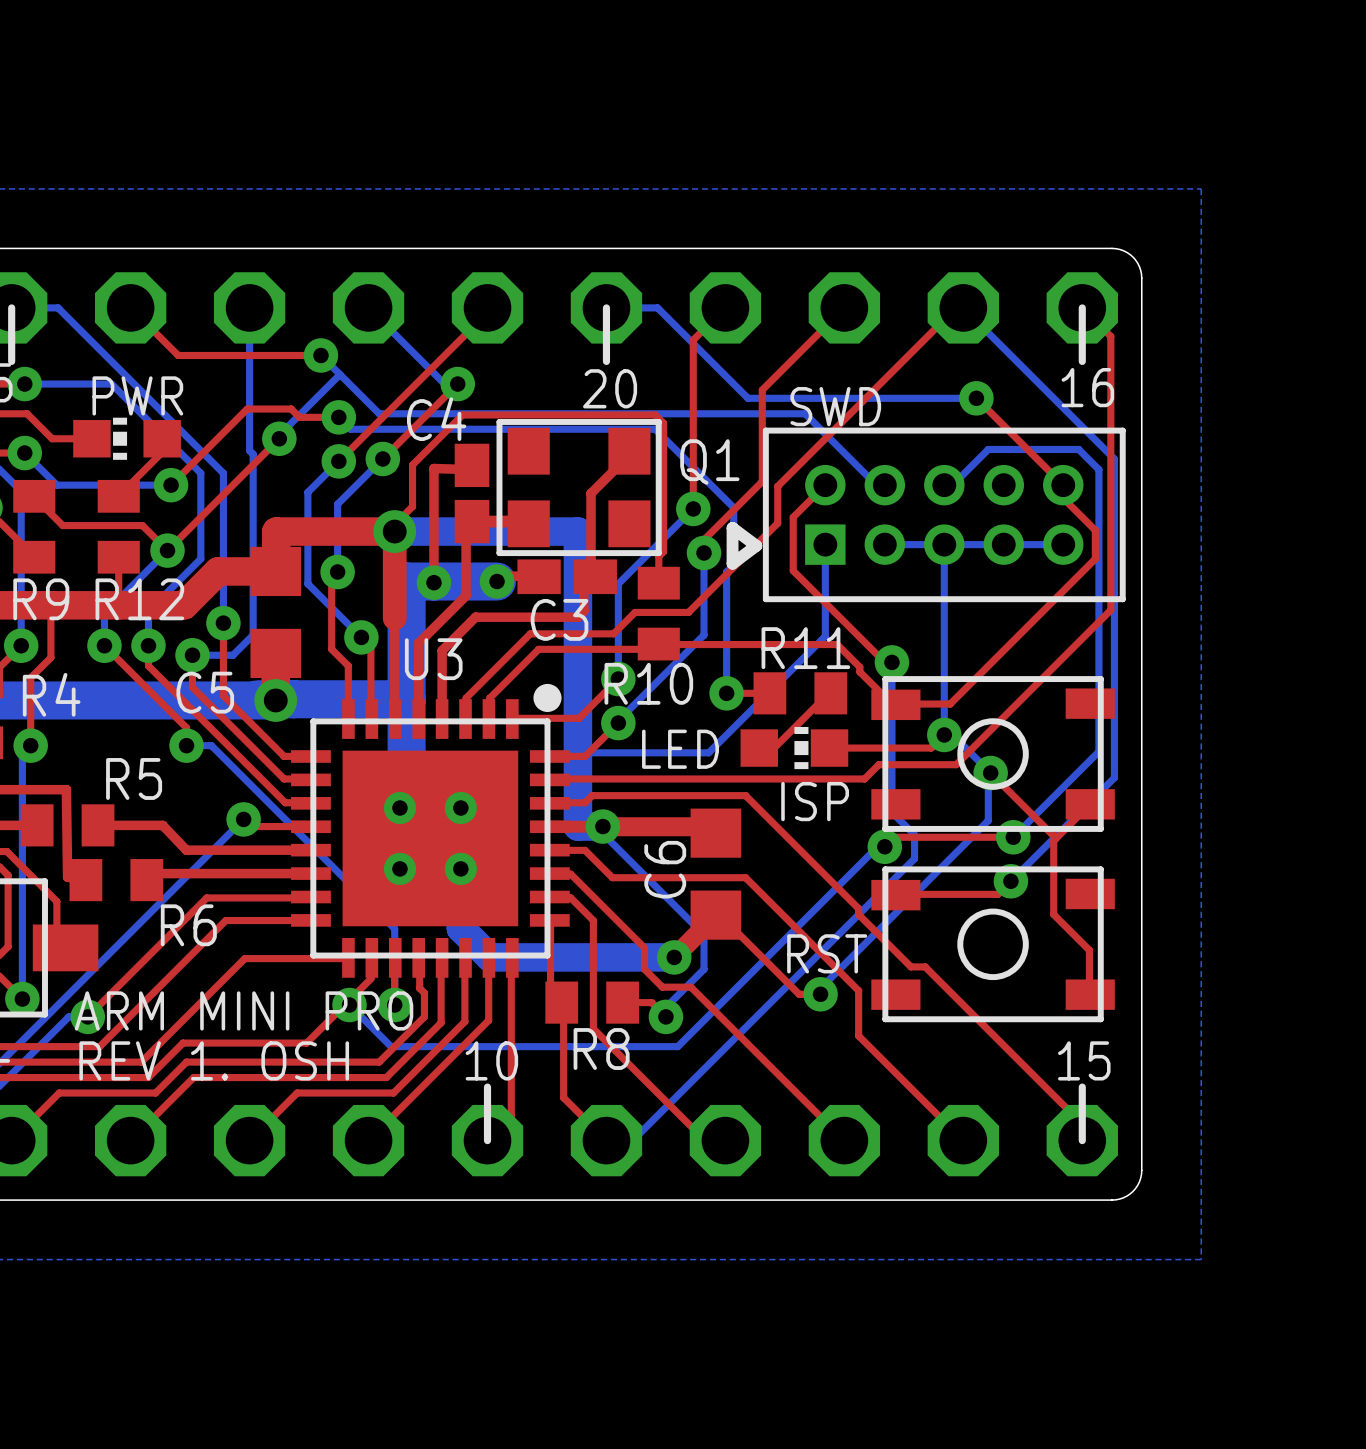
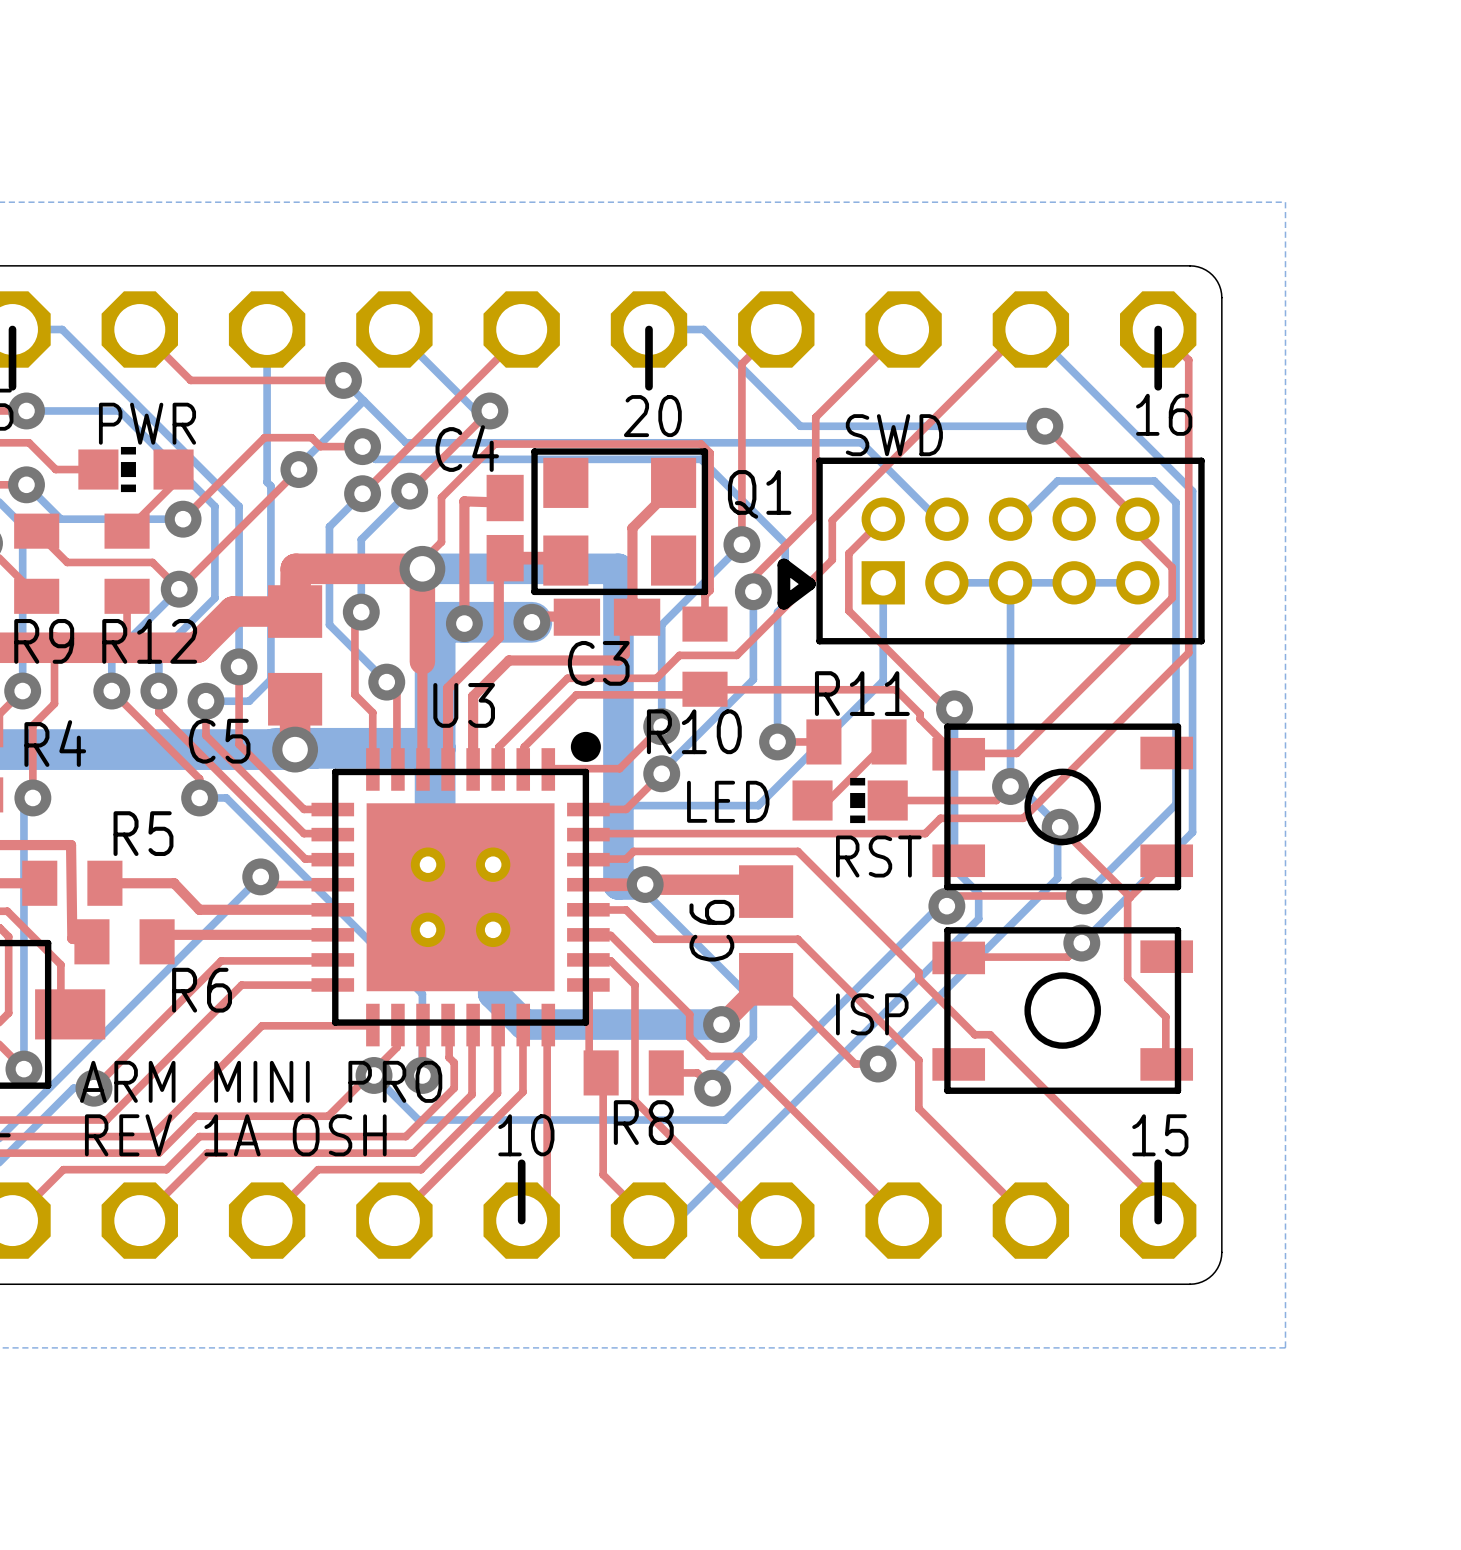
text: ISP (815, 801) -> RST (878, 856)
text: RST (827, 953) -> ISP (872, 1014)
text: REV 1. OSH (214, 1060) -> REV 1A OSH (235, 1135)

